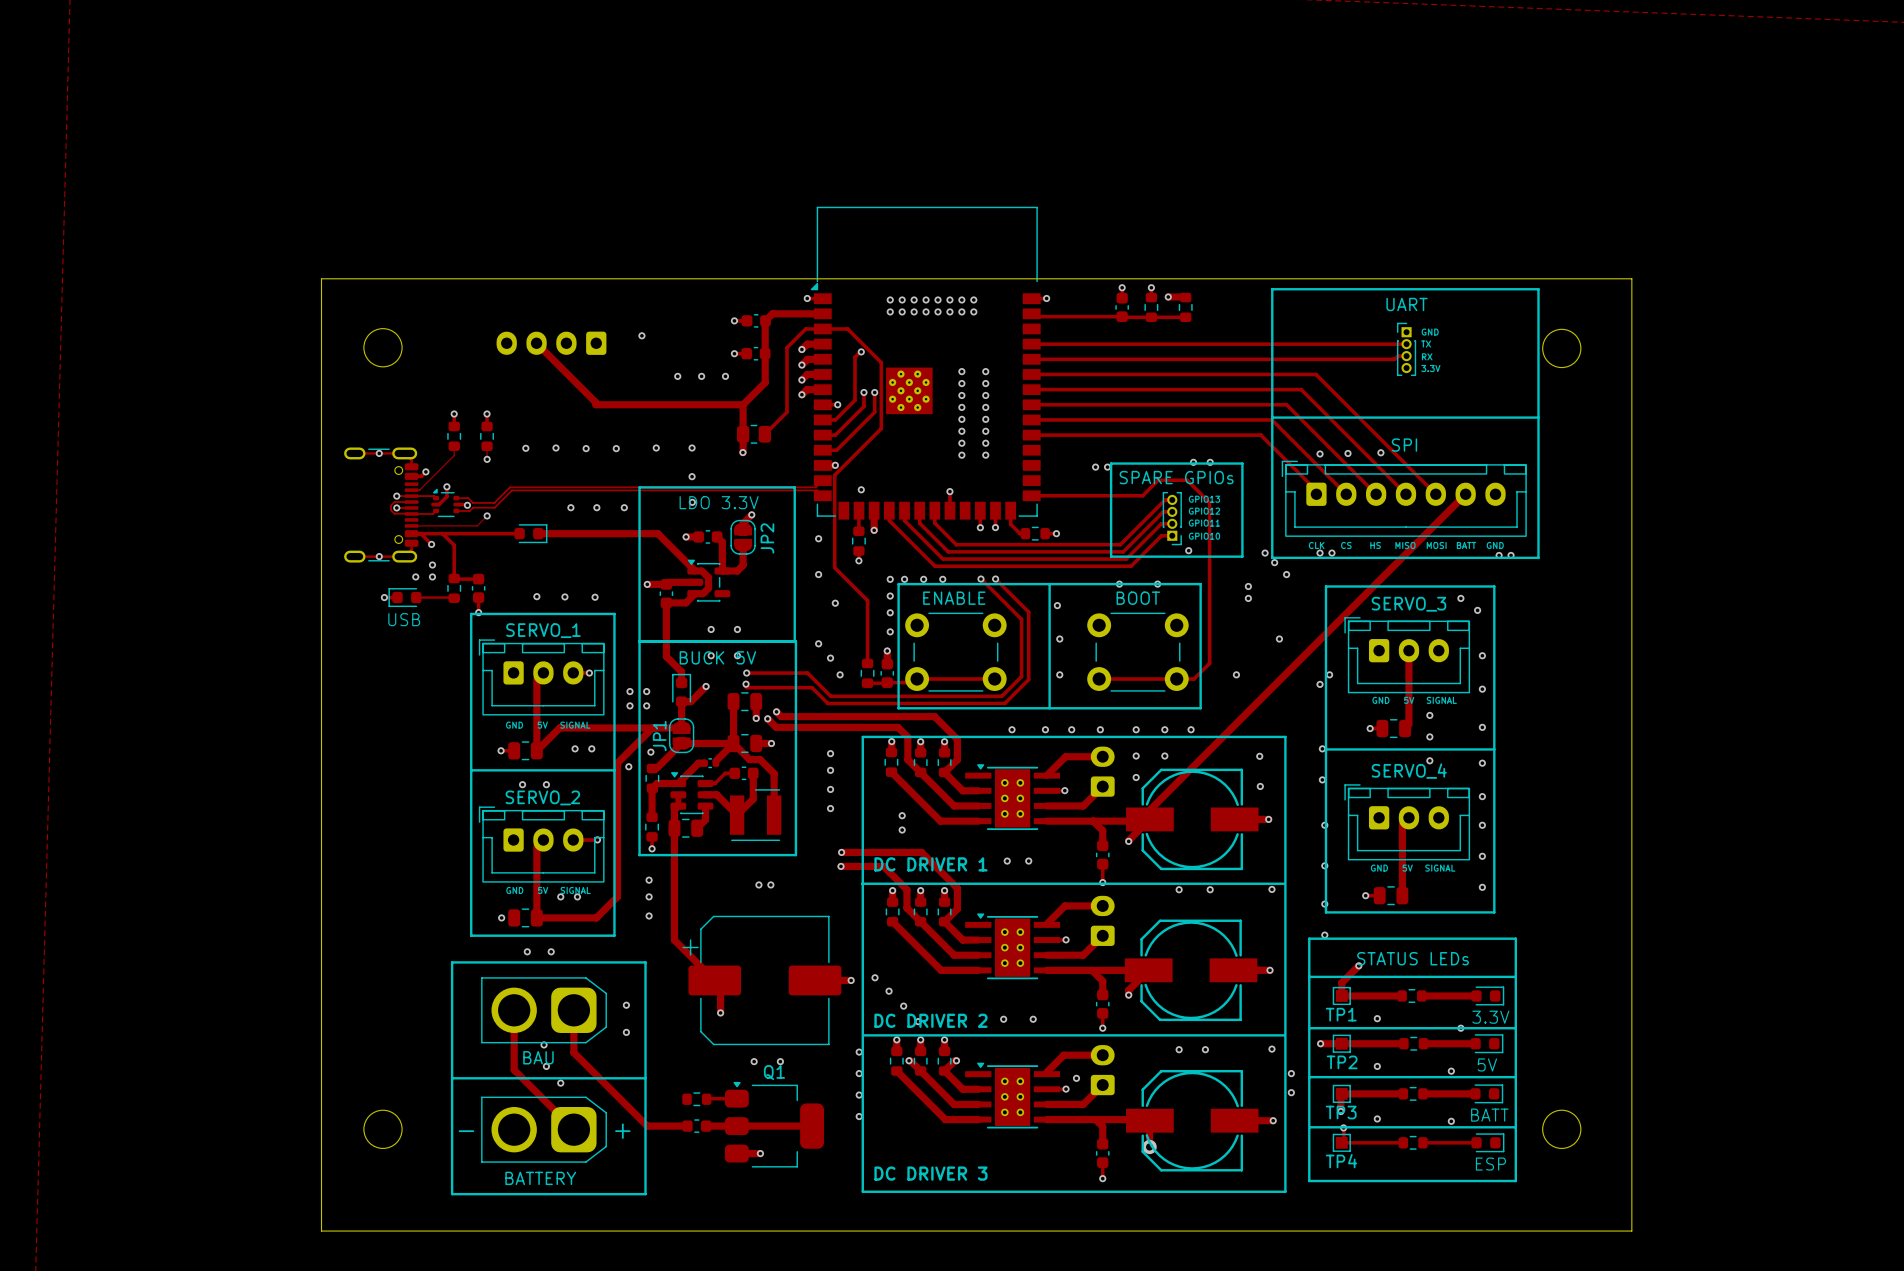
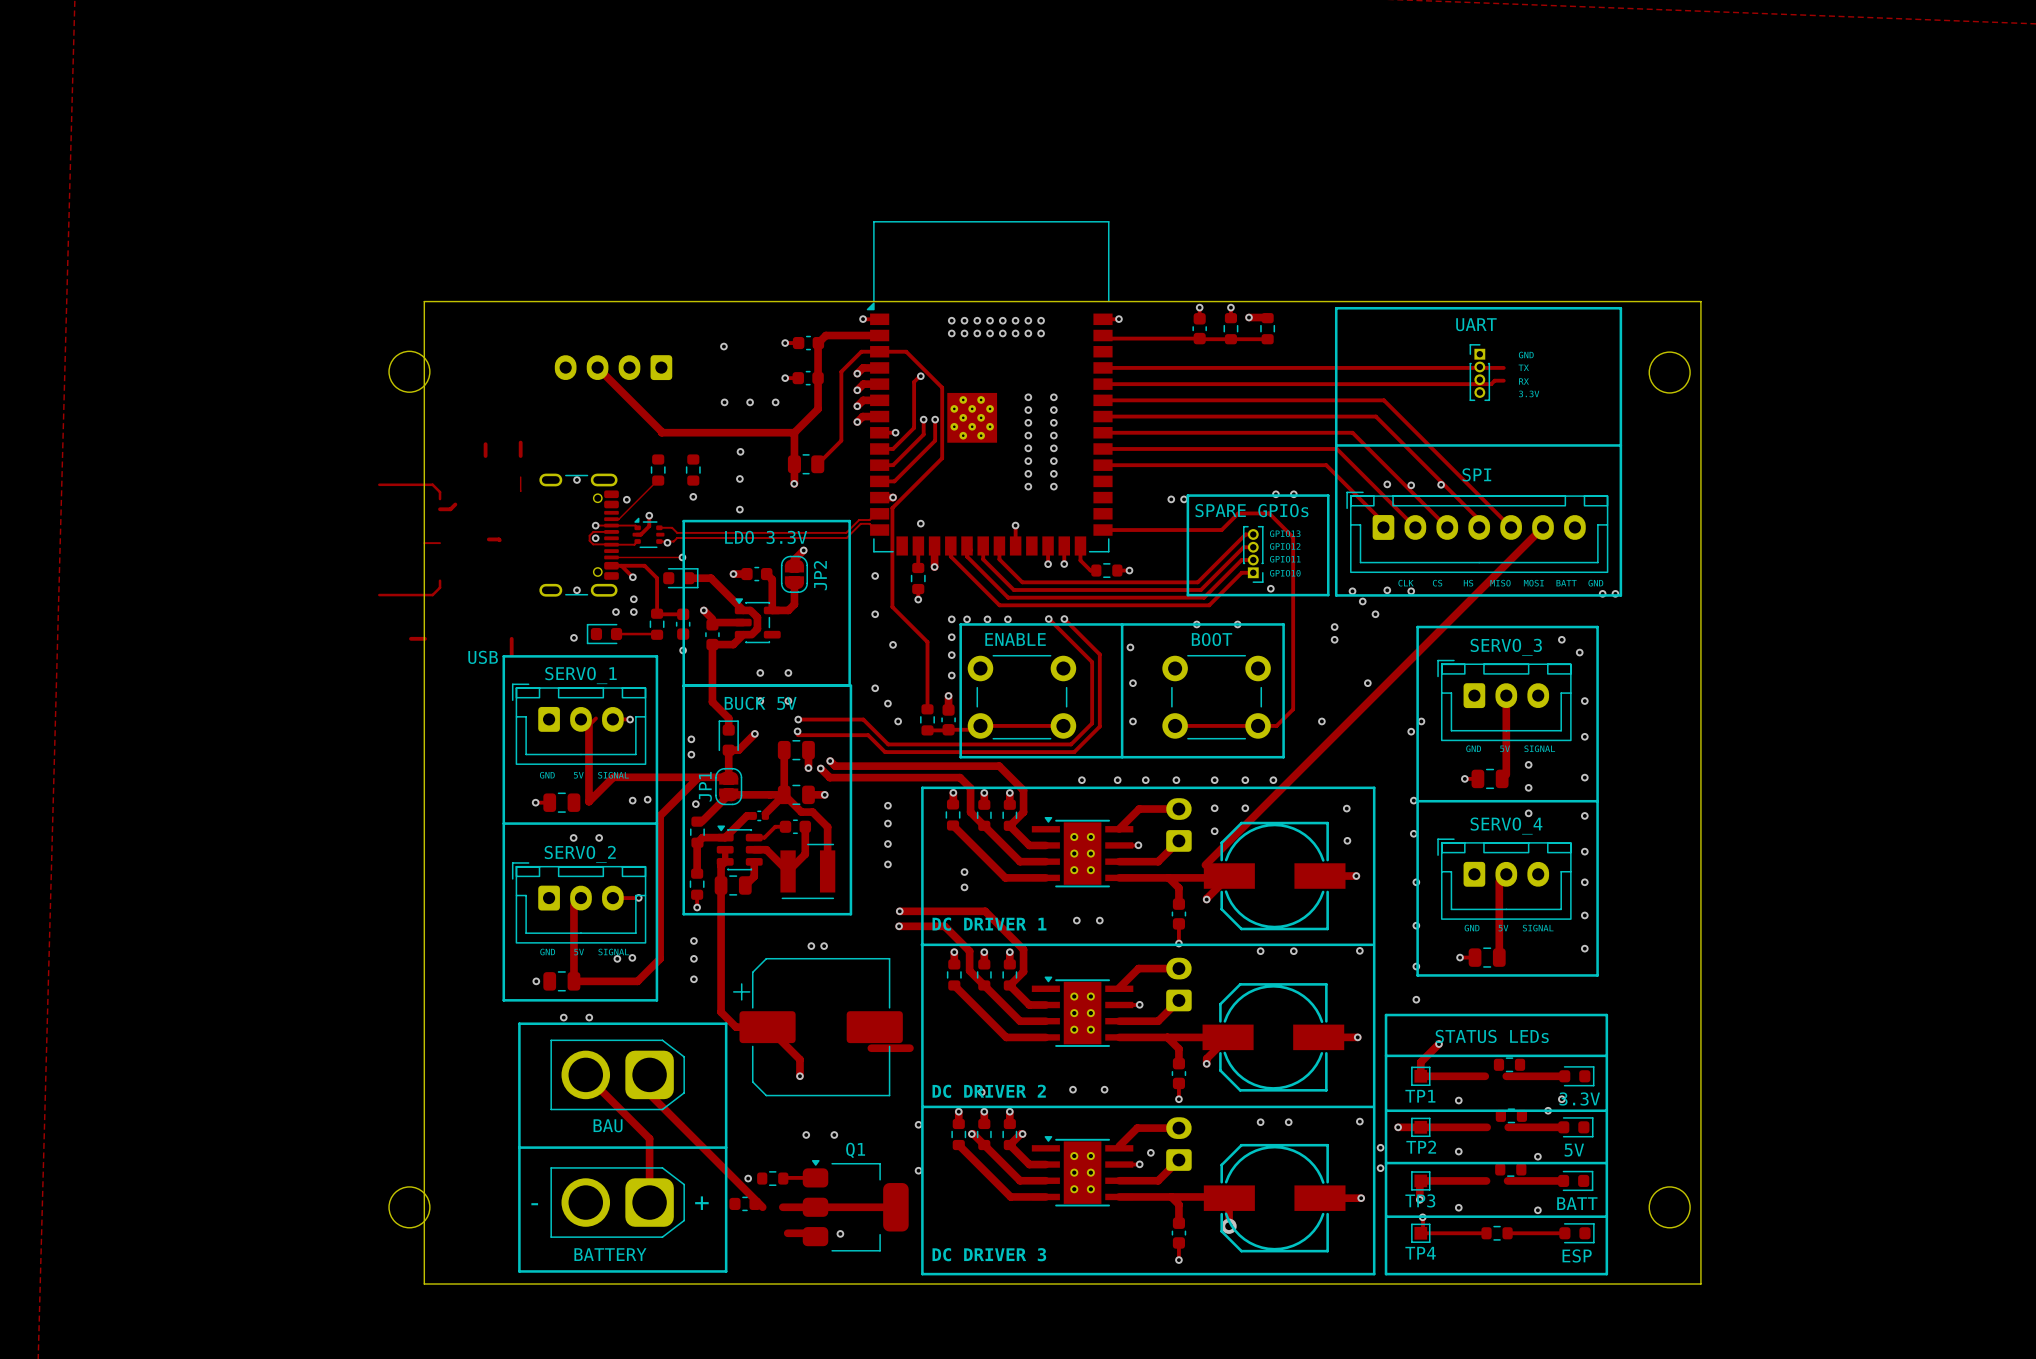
board edge: (321, 278) (1631, 278) (1631, 1231) (321, 1231) (321, 278) -> (424, 301) (424, 1284) (1700, 1284) (1700, 301) (424, 301)
line: (1272, 289) (1538, 289) (1538, 557) (1272, 557) (1272, 289) -> (1336, 308) (1620, 308) (1620, 595) (1336, 595) (1336, 308)
text position: UART (1407, 304) -> UART (1476, 324)
via position: (641, 335) -> (723, 346)
track: (536, 343) (595, 404) (618, 404) -> (597, 367) (661, 432)
part position: (551, 343) -> (613, 367)
part position: (1406, 349) -> (1479, 372)
track: (1294, 374) (1316, 374) (1435, 494) -> (1383, 400) (1511, 527)
track: (1286, 389) (1301, 389) (1405, 494) -> (1375, 416) (1479, 519) (1479, 527)
track: (1265, 404) (1286, 404) (1376, 494) -> (1352, 432) (1447, 527)
via: (454, 413) -> none
via: (487, 413) -> none
line: (1272, 417) (1538, 417) -> (1336, 445) (1620, 445)
track: (1250, 419) (1271, 419) (1346, 494) -> (1336, 448) (1415, 527)
via: none -> (740, 451)
track: (1240, 435) (1260, 435) (1316, 490) (1316, 494) -> (1326, 465) (1383, 522) (1383, 527)
part: (454, 436) -> none
part: (487, 436) -> none
part: none -> (658, 470)
part: none -> (693, 470)
text position: SPI (1404, 445) -> SPI (1476, 474)
track: (454, 446) (454, 455) (419, 490) (411, 490) -> none
via: (525, 448) -> none
via: none -> (576, 479)
via: (555, 448) -> none
via: (586, 448) -> none
via: (616, 448) -> none
via: (656, 448) -> none
track: none -> (658, 480) (618, 519) (611, 519)
via: (1380, 452) -> none
via: (379, 453) -> none
via: none -> (1387, 484)
via: (487, 459) -> none
via: none -> (693, 496)
via: none -> (626, 499)
via: (425, 471) -> none
track: (822, 480) (816, 487) (510, 487) (494, 502) (473, 502) (468, 498) (456, 498) -> (879, 513) (875, 513) (869, 520) (859, 520) (846, 532) (677, 532) (672, 527) (659, 527)
via: none -> (649, 515)
track: (446, 486) (446, 496) (439, 504) (435, 504) -> (649, 515) (649, 526) (640, 534) (636, 534)
via: (446, 486) -> none
via: none -> (595, 525)
track: (1465, 494) (1149, 810) -> (1543, 527) (1205, 865)
track: (822, 495) (817, 490) (512, 490) (494, 507) (473, 507) (469, 510) (456, 510) -> (879, 530) (875, 530) (869, 523) (860, 523) (846, 538) (677, 538) (673, 541) (659, 541)
via: (396, 496) -> none
track: (397, 496) (433, 496) (436, 498) -> (595, 525) (635, 525) (637, 527)
part position: (1404, 498) -> (1477, 532)
track: (417, 502) (394, 502) (391, 505) (391, 510) (394, 513) (411, 513) -> (618, 531) (593, 531) (589, 535) (589, 540) (593, 544) (611, 544)
part position: (446, 502) -> (648, 532)
via: (692, 502) -> none
via: none -> (595, 538)
part position: (381, 505) -> (579, 535)
via: (467, 505) -> none
via: (396, 507) -> none
via: (570, 507) -> none
via: (596, 507) -> none
track: (436, 510) (433, 513) (411, 513) -> (637, 541) (634, 544) (611, 544)
track: (487, 515) (477, 525) (411, 525) -> none
via: (487, 515) -> none
track: none -> (611, 557) (682, 557)
via: none -> (682, 557)
track: none -> (611, 565) (644, 565) (657, 578) (657, 613) (683, 614)
track: (411, 533) (519, 533) -> none
track: (420, 533) (431, 544) -> (621, 565) (632, 577)
track: (442, 533) (454, 545) (454, 578) (478, 579) -> none
part: (530, 533) -> none
track: (538, 533) (657, 533) (665, 540) -> (688, 578) (711, 578)
via: none -> (632, 577)
part: none -> (680, 578)
via: (431, 544) -> none
via: none -> (576, 590)
via position: (1331, 553) -> (1387, 590)
via: (379, 556) -> none
via: none -> (633, 599)
via: (432, 565) -> none
via: none -> (703, 610)
via: none -> (615, 612)
via: none -> (633, 612)
via: (415, 576) -> none
via: (432, 576) -> none
part: none -> (657, 624)
track: (647, 584) (666, 584) -> (703, 610) (712, 619) (712, 624)
via: (647, 584) -> none
part: (454, 588) -> none
part position: (478, 588) -> (683, 624)
part: none -> (604, 634)
via: (564, 596) -> none
via: (384, 597) -> none
part: (404, 597) -> none
track: (416, 597) (454, 598) -> (616, 634) (657, 634)
via: (595, 597) -> none
via: none -> (683, 650)
via: (478, 612) -> none
text position: USB (404, 619) -> USB (483, 657)
track: (543, 672) (536, 679) (536, 750) (559, 727) (681, 727) -> none
track: none -> (595, 718) (588, 725) (588, 801) (613, 777) (729, 777)
via: (629, 691) -> none
via: (629, 705) -> none
via: none -> (647, 799)
via: (575, 748) -> none
via: (628, 766) -> none
via: none -> (573, 837)
via: none -> (599, 837)
via: (522, 784) -> none
via: (546, 784) -> none
via position: (560, 896) -> (632, 957)
line: (1309, 938) (1515, 938) (1515, 1181) (1309, 1181) (1309, 938) -> (1386, 1015) (1606, 1015) (1606, 1274) (1386, 1274) (1386, 1015)
track: (674, 940) (720, 986) (720, 1012) -> (721, 1005) (721, 1012) (736, 1027) (767, 1027) (799, 1059) (799, 1076)
text position: STATUS LEDs (1413, 958) -> STATUS LEDs (1492, 1036)
line: (452, 962) (645, 962) (645, 1194) (452, 1194) (452, 962) -> (519, 1023) (726, 1023) (726, 1271) (519, 1271) (519, 1023)
track: (1358, 965) (1341, 982) (1341, 995) (1402, 995) -> (1438, 1044) (1420, 1062) (1420, 1076) (1485, 1076)
via position: (1358, 965) -> (1438, 1044)
line: (1309, 976) (1514, 976) -> (1386, 1055) (1605, 1055)
via: (875, 977) -> none
part position: (761, 980) -> (817, 1027)
via: (851, 980) -> none
via: (889, 991) -> none
TP1 position: (1341, 995) -> (1420, 1076)
track: (1421, 995) (1476, 995) -> (1506, 1076) (1564, 1076)
part position: (1487, 995) -> (1576, 1076)
track: none -> (585, 1074) (649, 1138) (649, 1202)
track: none -> (649, 1074) (649, 1094) (762, 1207)
via: (626, 1005) -> none
via: (903, 1006) -> none
track: (514, 1010) (514, 1070) (573, 1129) -> none
part position: (544, 1010) -> (617, 1074)
track: (573, 1010) (573, 1052) (647, 1126) (687, 1126) -> none
via position: (720, 1012) -> (799, 1076)
text position: 3.3V (1490, 1017) -> 3.3V (1579, 1098)
via position: (1377, 1018) -> (1458, 1100)
line: (1310, 1028) (1515, 1028) -> (1387, 1110) (1606, 1110)
via: (626, 1032) -> none
via: none -> (1548, 1110)
track: (1320, 1043) (1403, 1043) -> (1398, 1127) (1487, 1127)
via position: (1320, 1043) -> (1398, 1127)
TP2 position: (1341, 1043) -> (1420, 1127)
track: (1423, 1043) (1475, 1043) -> (1508, 1127) (1563, 1127)
part position: (1486, 1043) -> (1575, 1127)
via: (544, 1044) -> none
text position: BAU (538, 1057) -> BAU (608, 1125)
text position: 5V (1487, 1064) -> 5V (1574, 1150)
via: (546, 1066) -> none
via position: (1377, 1066) -> (1458, 1151)
via: (1451, 1071) -> none
via: (859, 1073) -> none
line: (1309, 1077) (1514, 1077) -> (1386, 1163) (1605, 1163)
line: (452, 1078) (645, 1078) -> (519, 1147) (726, 1147)
via: none -> (1537, 1156)
via: (560, 1083) -> none
TP3 position: (1341, 1093) -> (1420, 1180)
track: (1403, 1093) (1341, 1093) (1340, 1111) -> (1486, 1180) (1420, 1180) (1419, 1199)
track: (1422, 1093) (1475, 1093) -> (1507, 1180) (1563, 1180)
part position: (1486, 1093) -> (1575, 1180)
track: (736, 1098) (706, 1099) -> none
part position: (696, 1099) -> (772, 1178)
track: none -> (783, 1177) (815, 1177)
via: none -> (748, 1178)
via: (1340, 1111) -> none
text position: BATT (1489, 1115) -> BATT (1577, 1203)
via: (859, 1116) -> none
via: (1377, 1118) -> none
via position: (1451, 1121) -> (1537, 1210)
via: none -> (1419, 1199)
Q1 position: (774, 1124) -> (855, 1205)
track: (706, 1126) (812, 1126) -> (782, 1207) (895, 1207)
line: (1310, 1127) (1515, 1127) -> (1387, 1216) (1606, 1216)
track: (1343, 1127) (1343, 1142) (1403, 1142) -> (1422, 1217) (1423, 1233) (1486, 1233)
via: (1343, 1127) -> none
part position: (544, 1129) -> (617, 1202)
via: none -> (1458, 1207)
via: none -> (1422, 1217)
TP4 position: (1341, 1142) -> (1420, 1233)
part position: (1413, 1142) -> (1497, 1233)
track: (1422, 1142) (1476, 1142) -> (1507, 1233) (1564, 1233)
part position: (1487, 1142) -> (1576, 1233)
via position: (760, 1153) -> (840, 1233)
text position: ESP (1490, 1164) -> ESP (1577, 1255)
text position: BATTERY (540, 1178) -> BATTERY (610, 1254)

